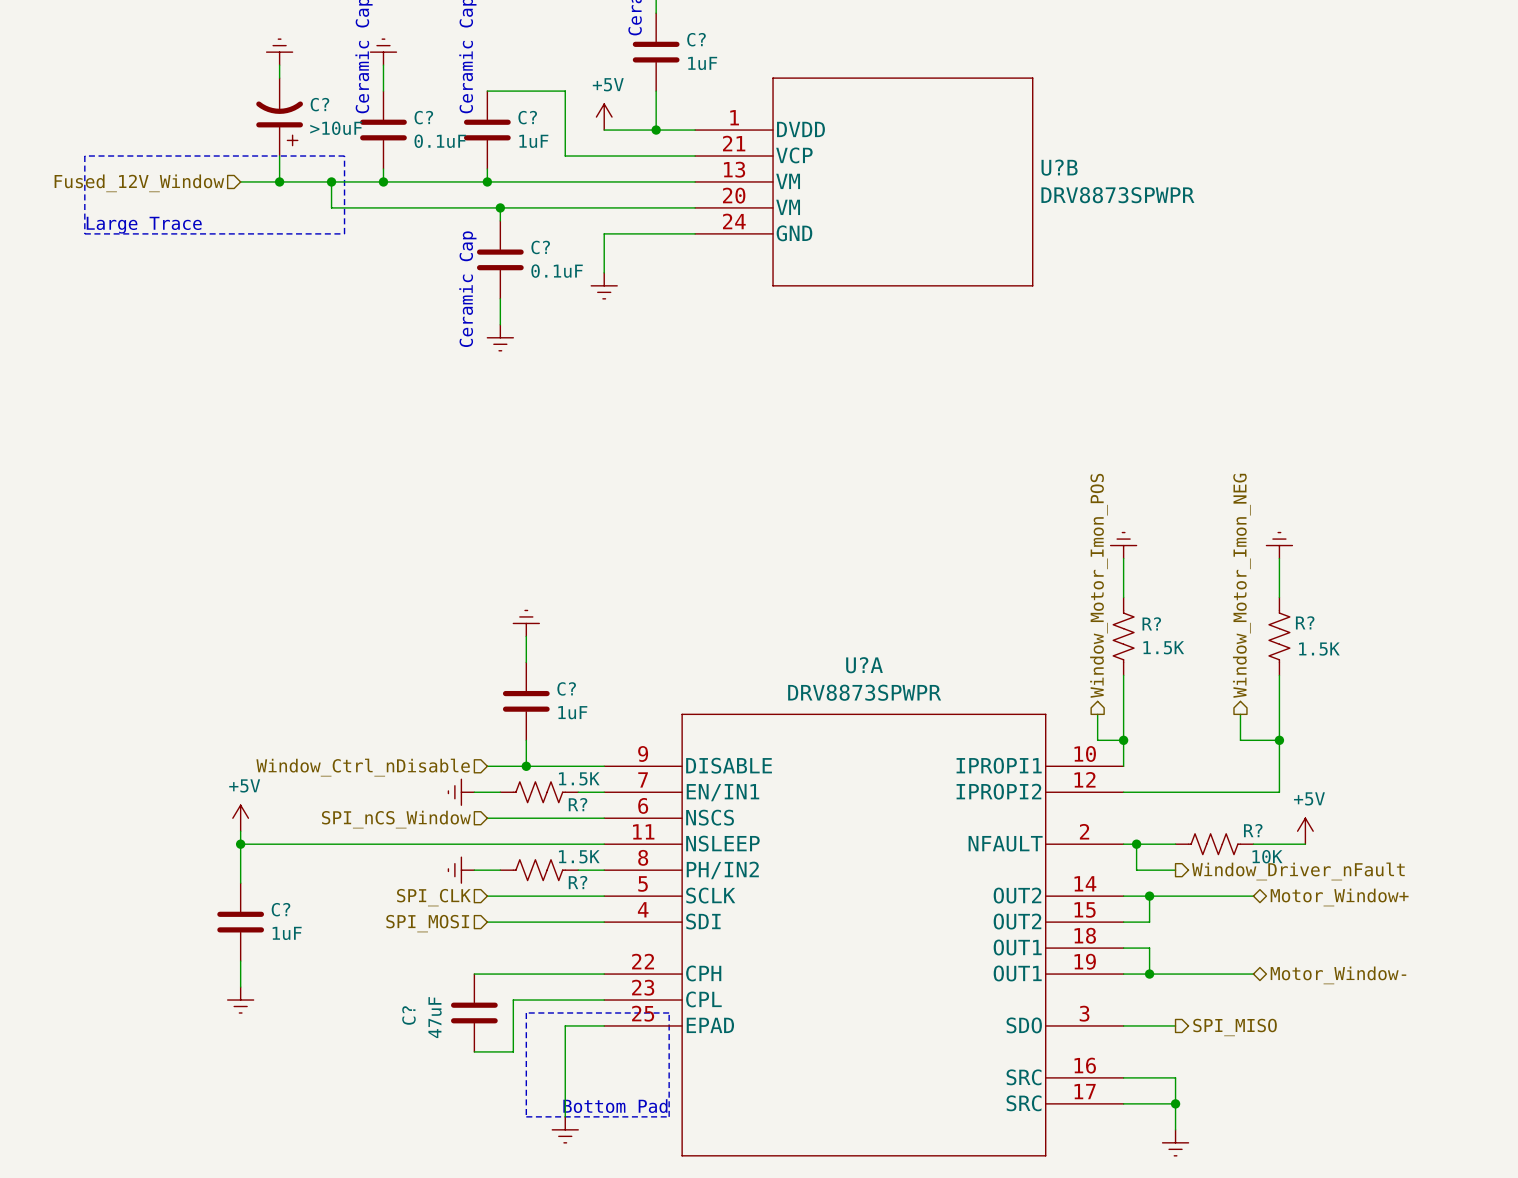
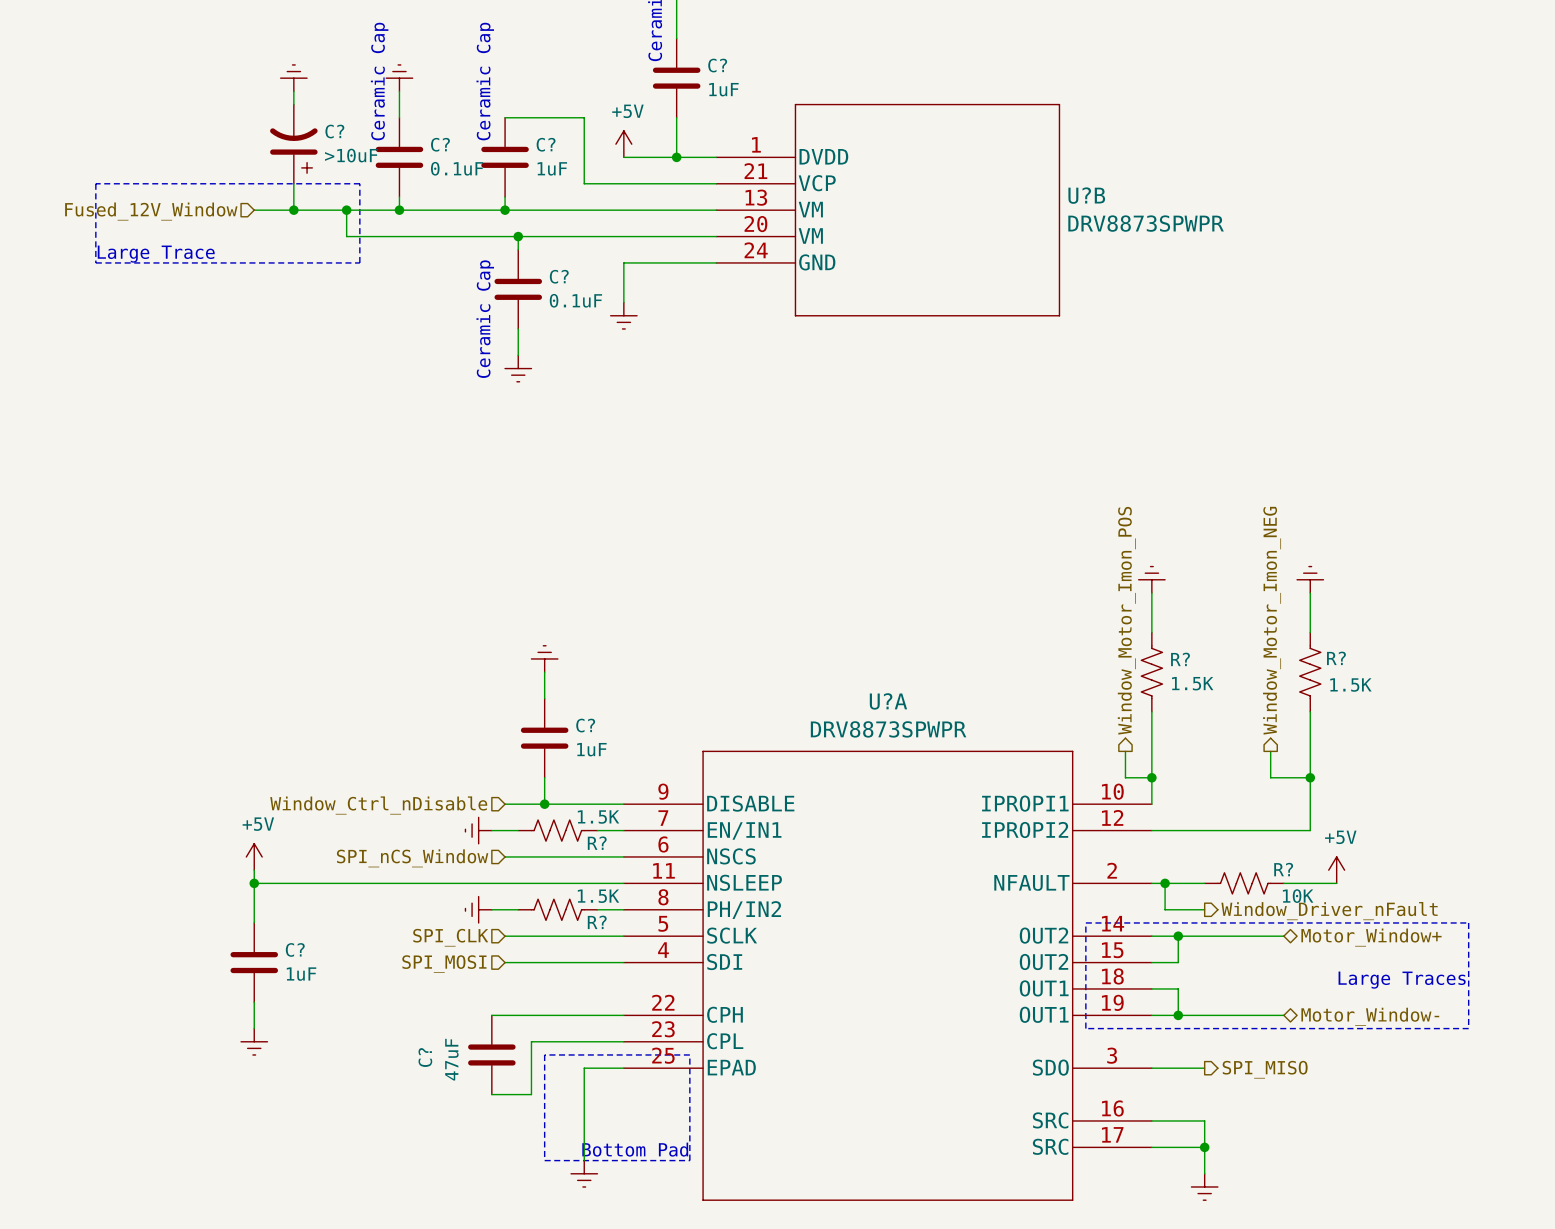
line: none -> (1085, 922) (1085, 1028) (1468, 1028) (1468, 922) (1085, 922)
text: none -> Large Traces (1402, 980)

